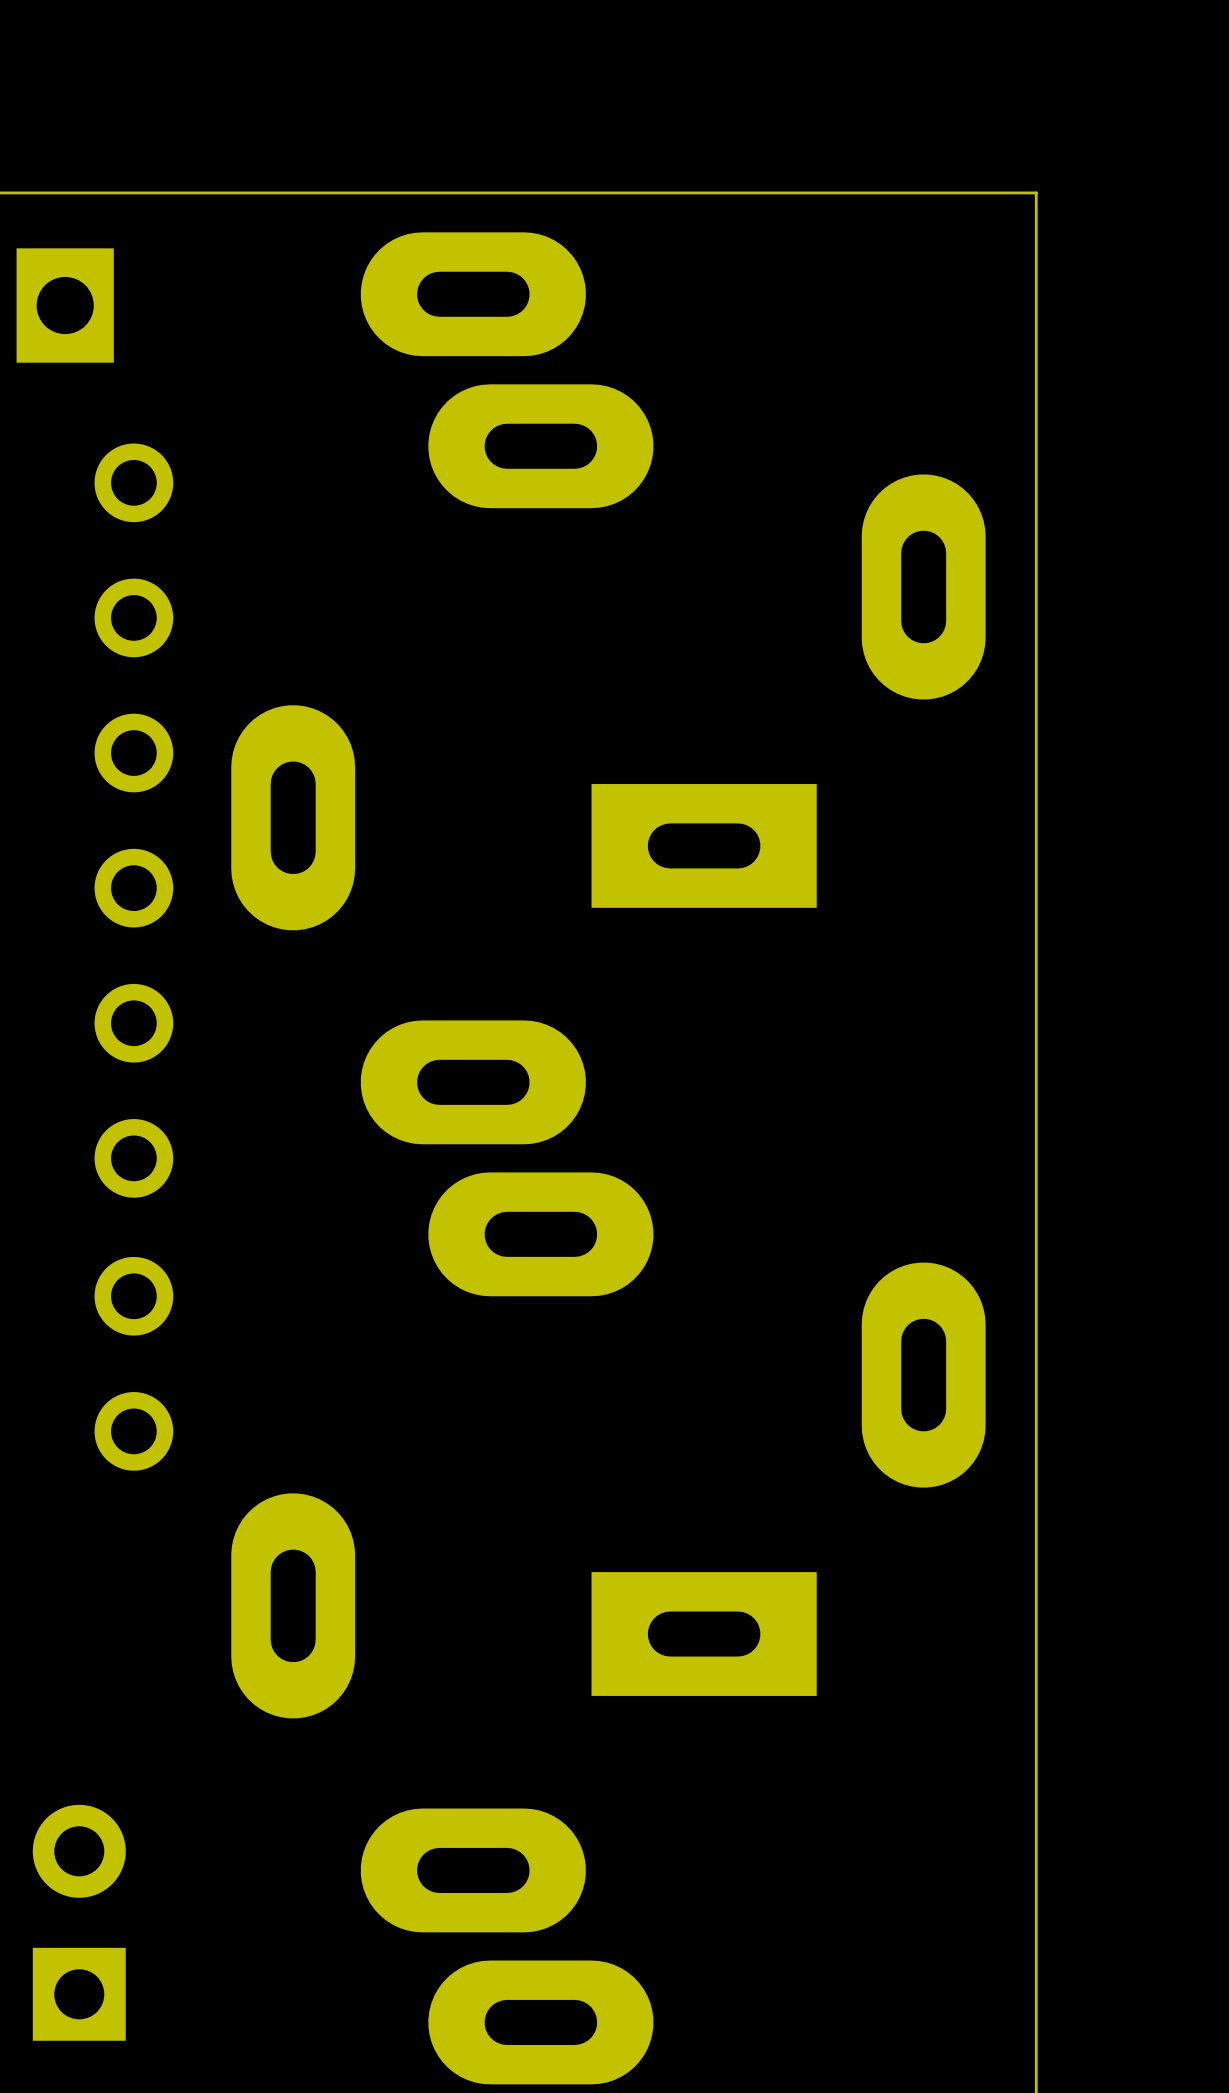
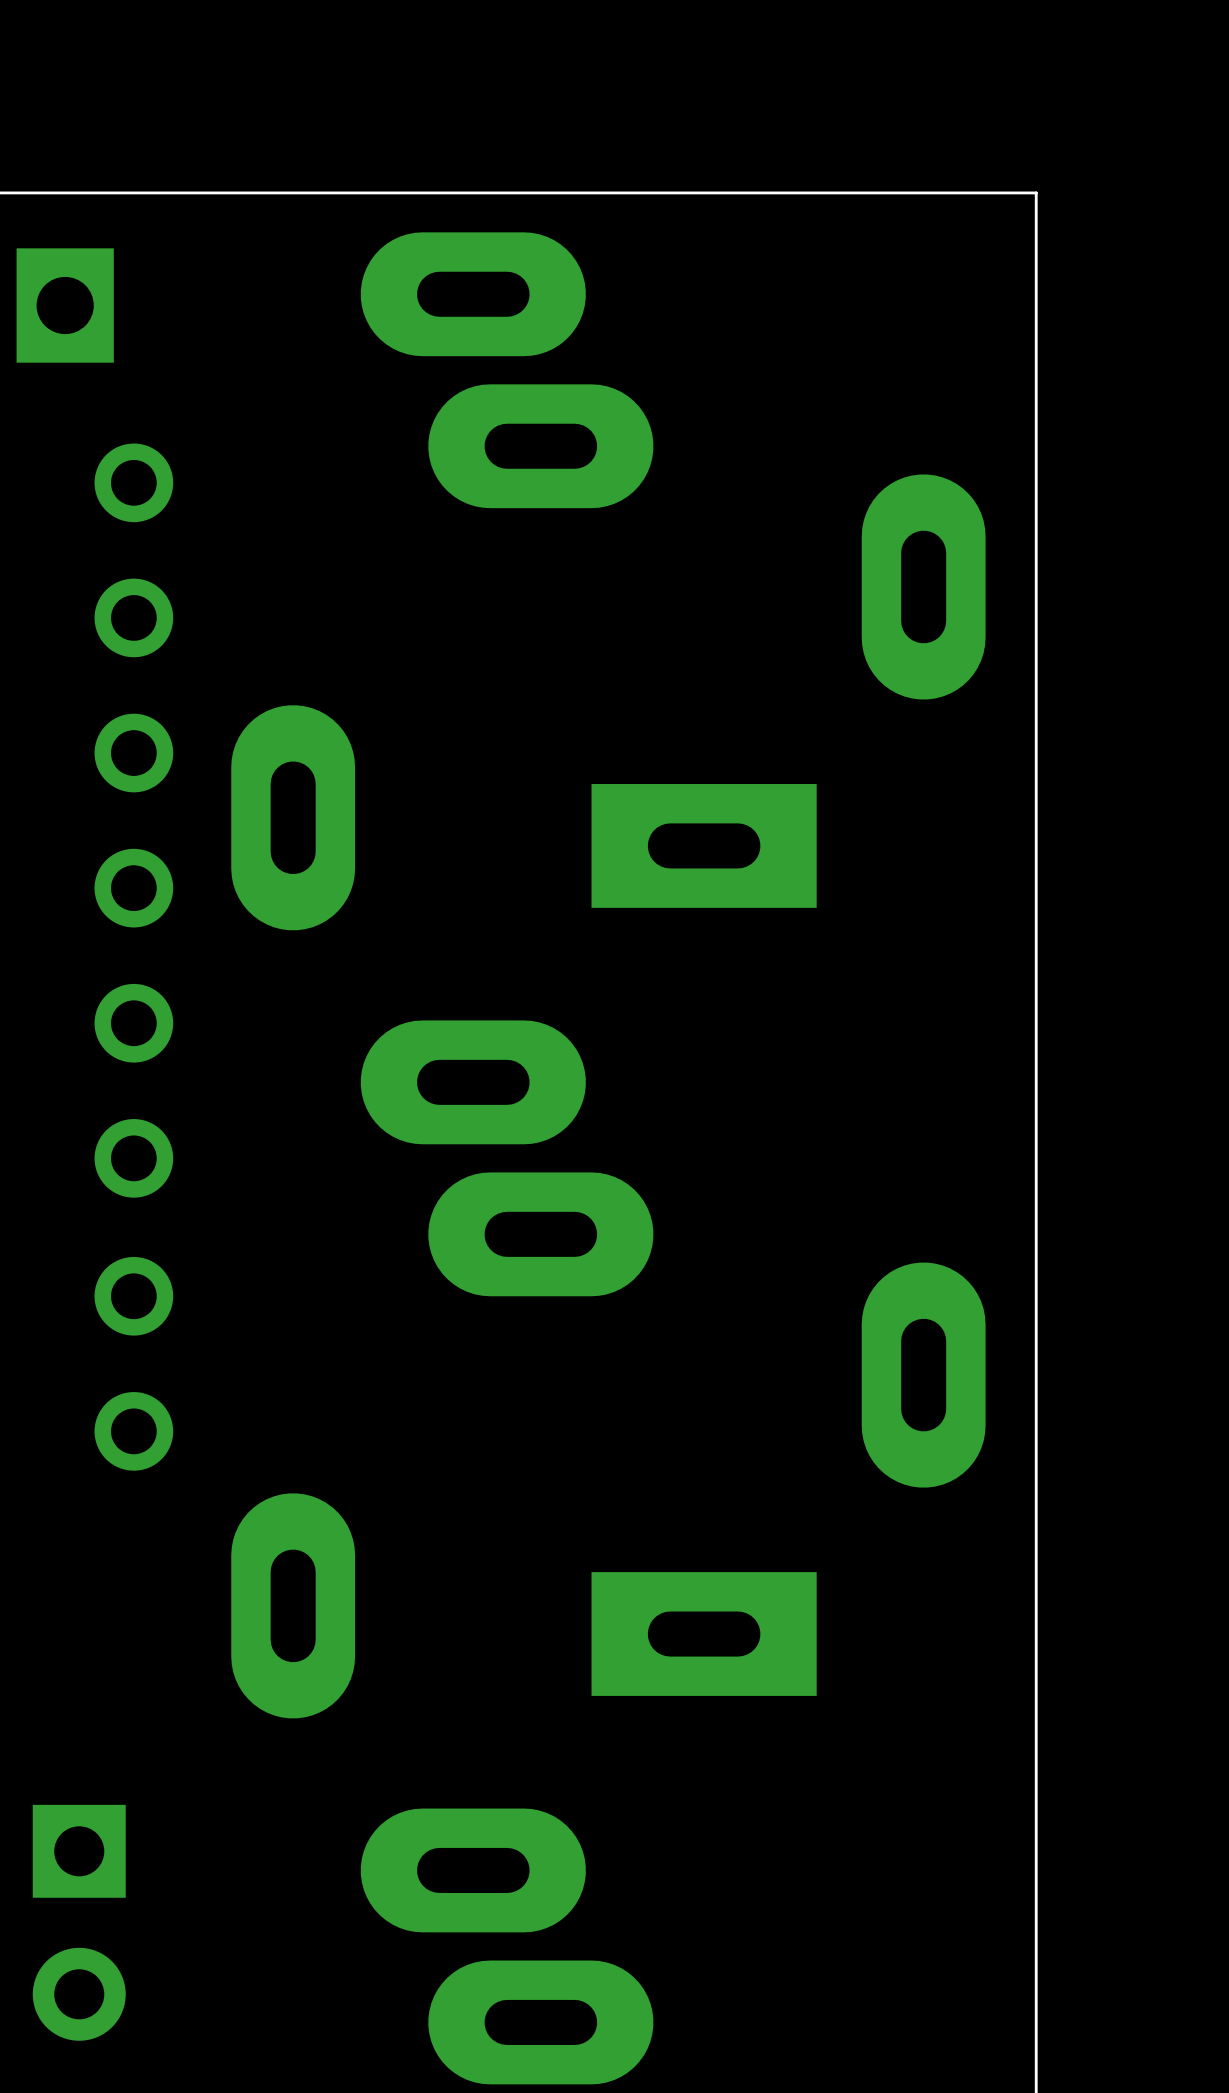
part rotation: 0° (79, 1922) -> 180° (79, 1922)

